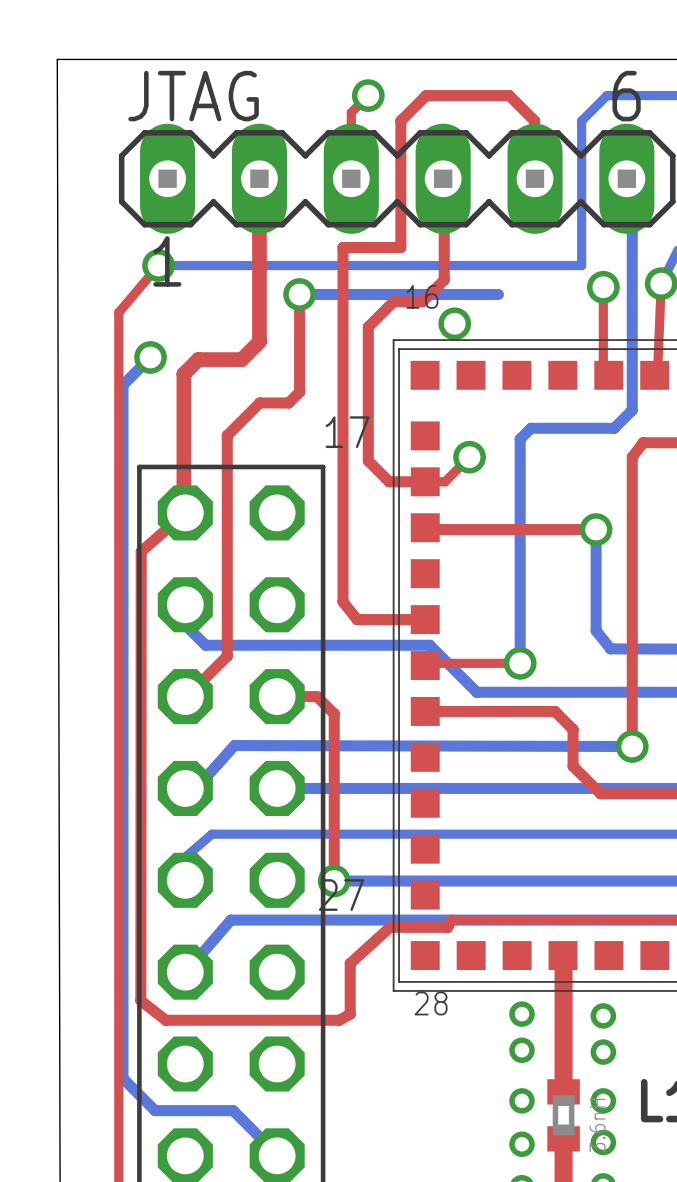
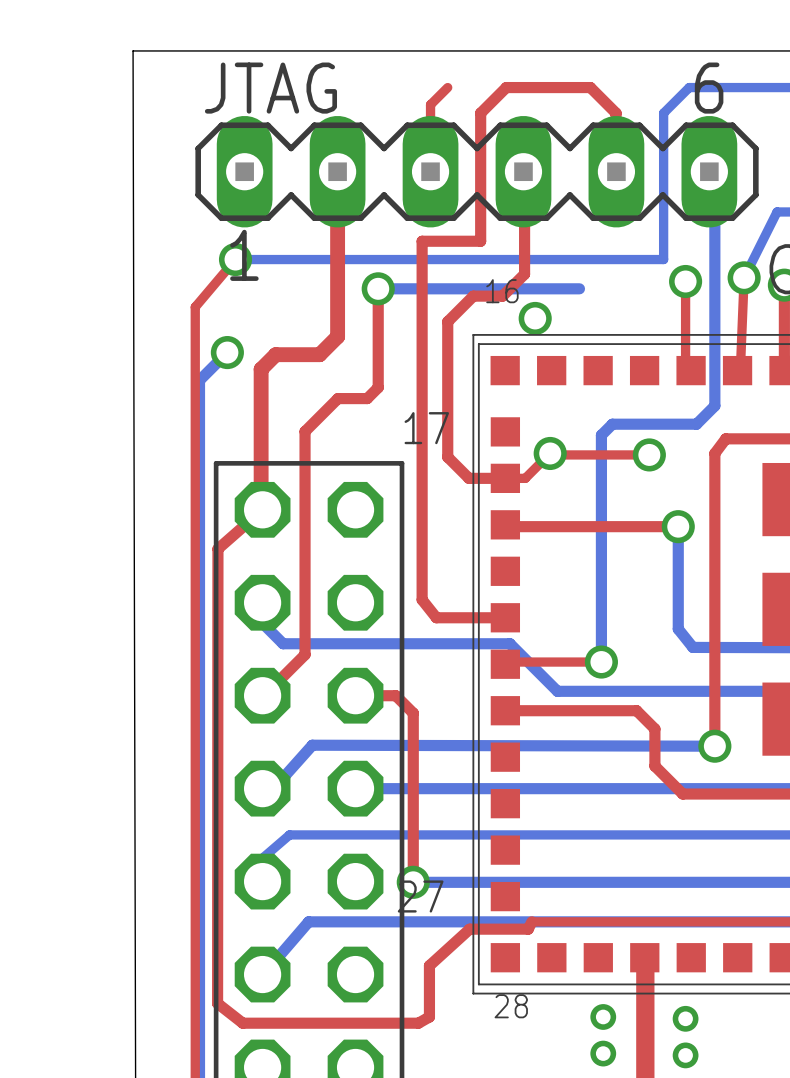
via: (368, 95) -> none
top track: none -> (550, 453) (649, 454)
via: none -> (649, 454)

